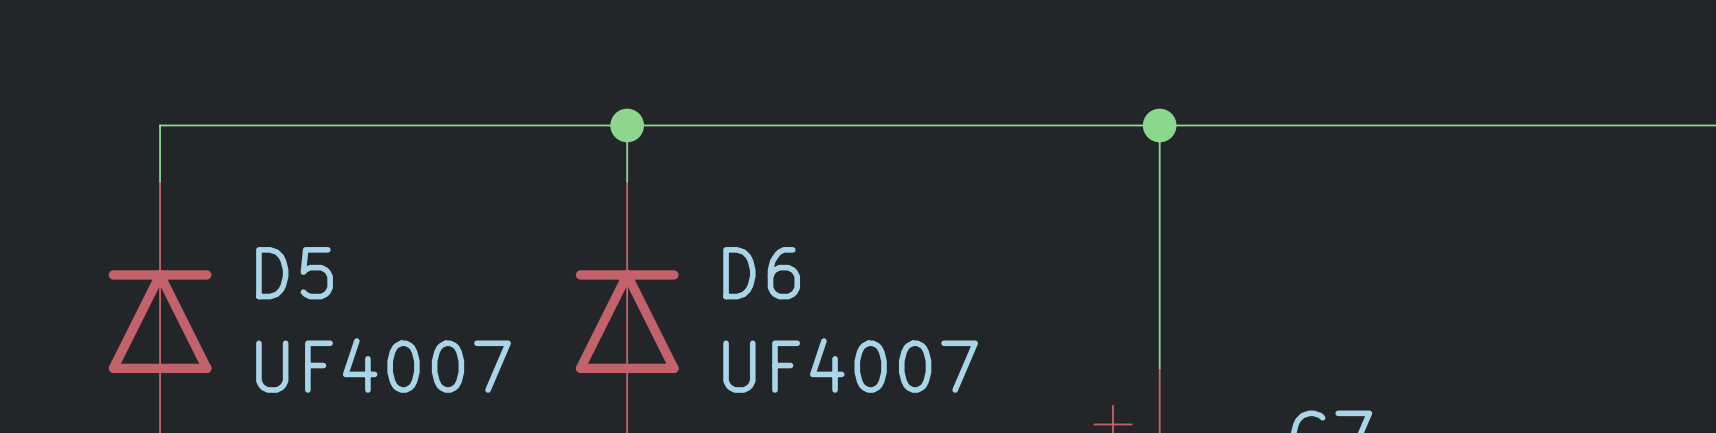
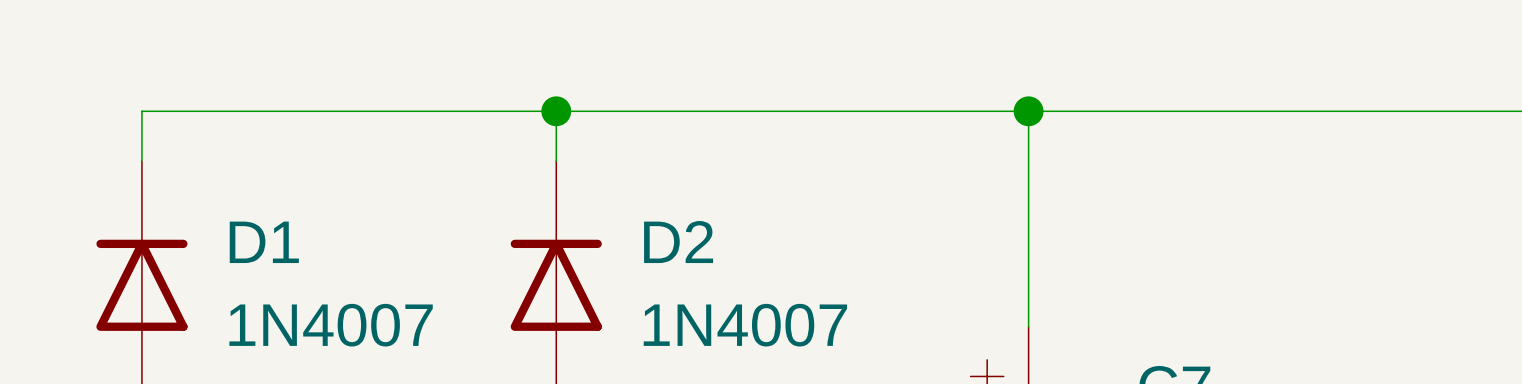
D5 name: D5 (294, 273) -> D1 (264, 242)
D6 name: D6 (761, 273) -> D2 (678, 242)
D5 value: UF4007 (383, 365) -> 1N4007 (331, 325)
D6 value: UF4007 (850, 365) -> 1N4007 (745, 325)

